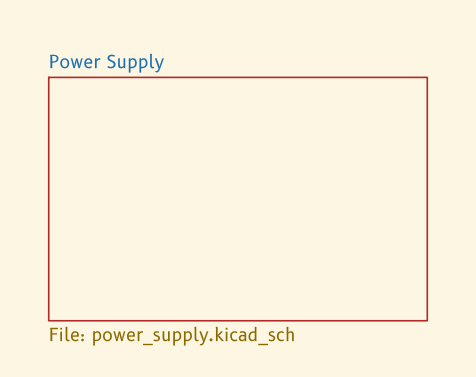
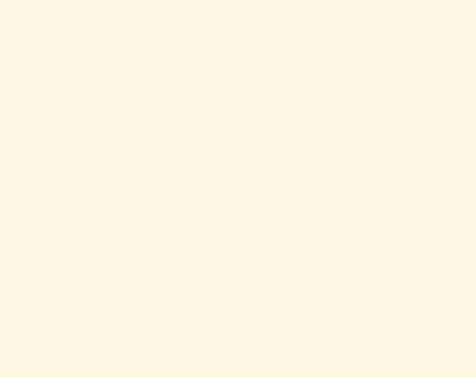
sheet Power Supply: File: power_supply.kicad_sch (238, 199) -> none

